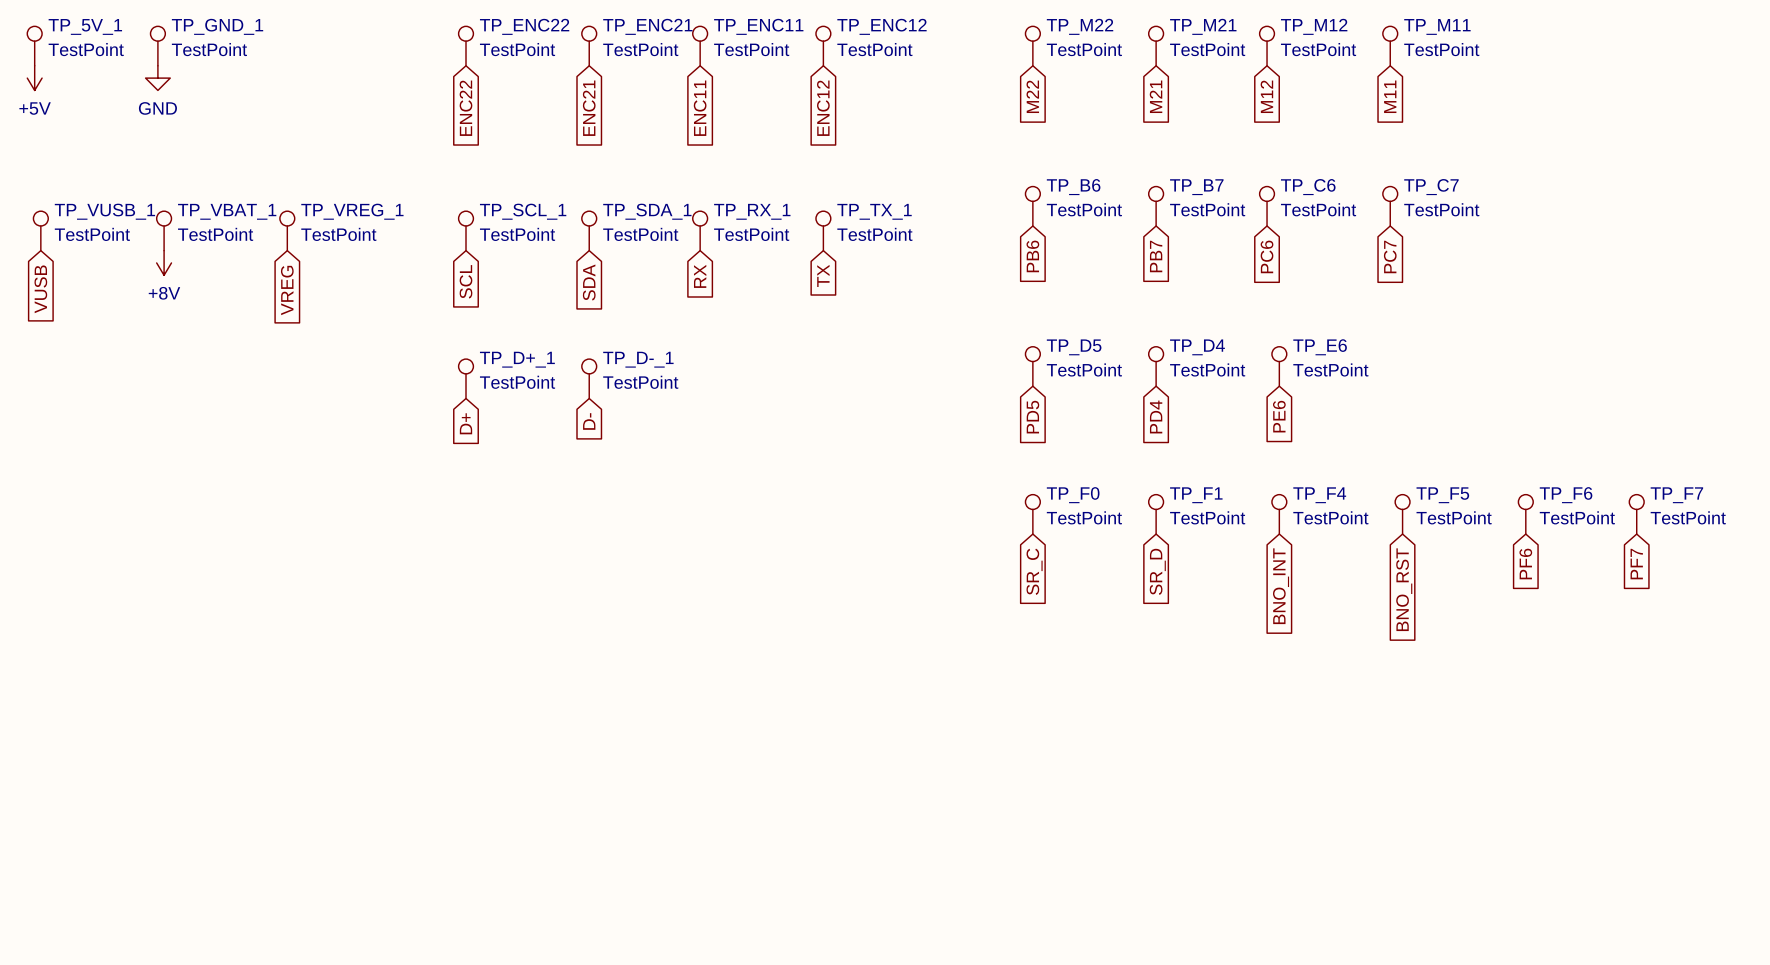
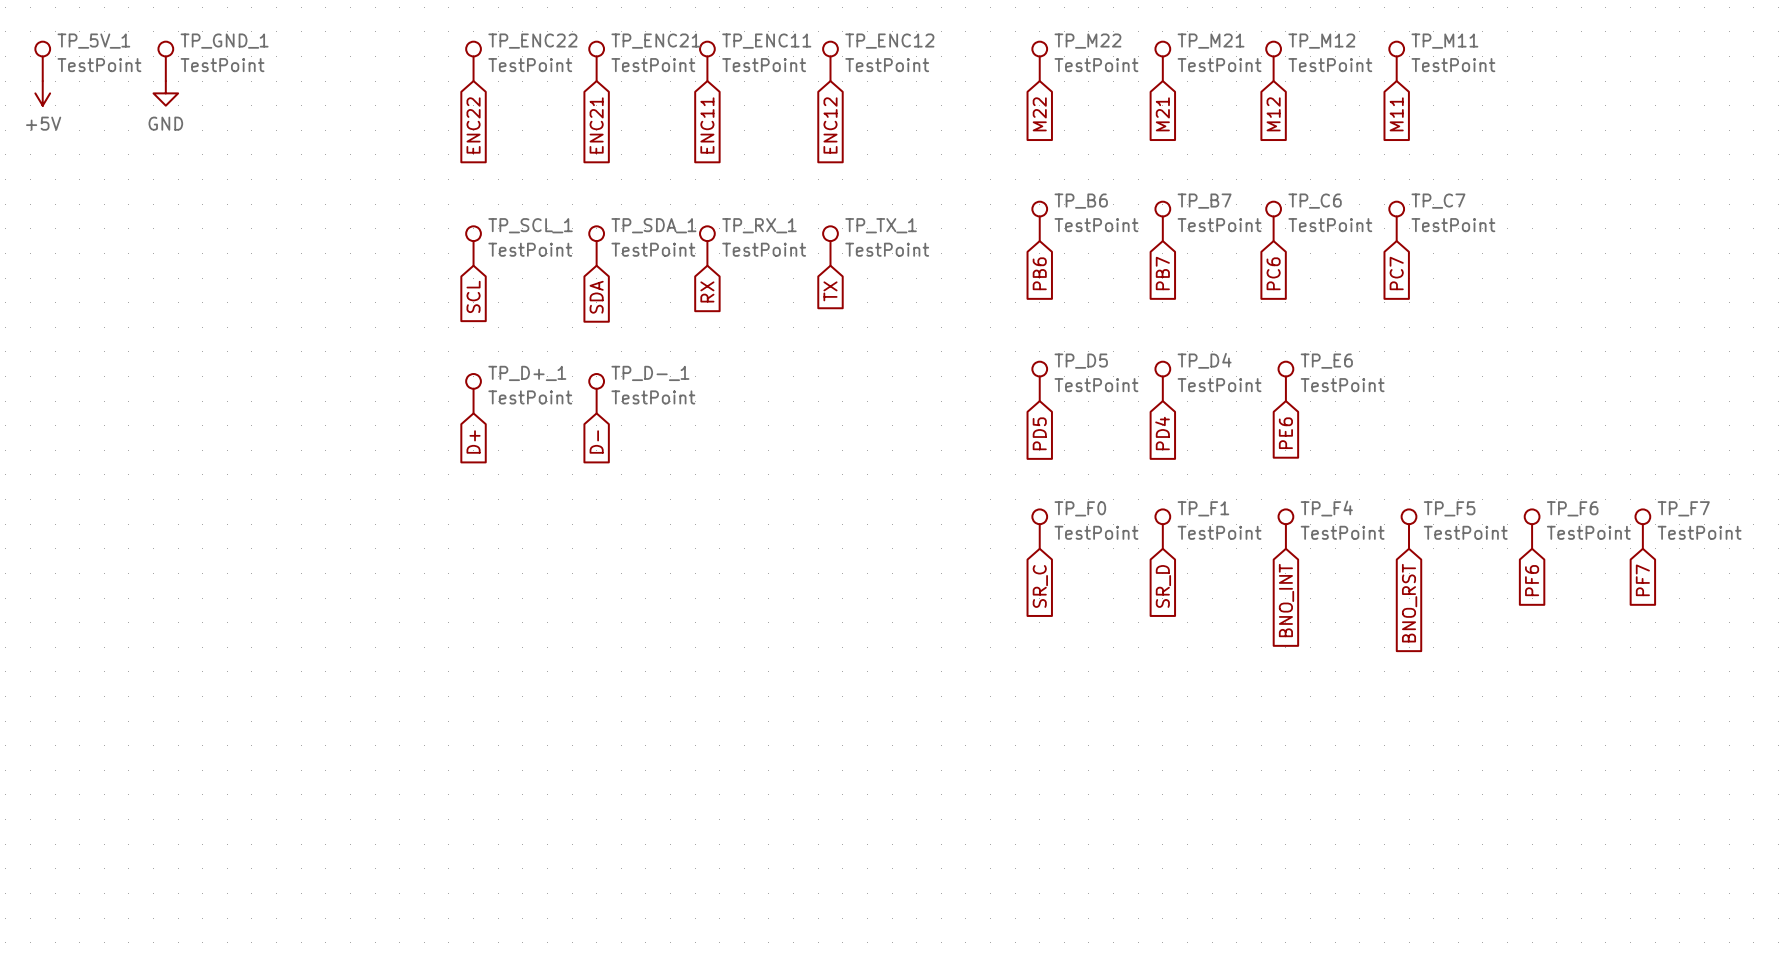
TP_VUSB_1: TestPoint (40, 230) -> none
TP_VBAT_1: TestPoint (164, 230) -> none
TP_VREG_1: TestPoint (287, 230) -> none
power symbol: +8V (164, 262) -> none
global label: VUSB (40, 289) -> none
global label: VREG (287, 290) -> none

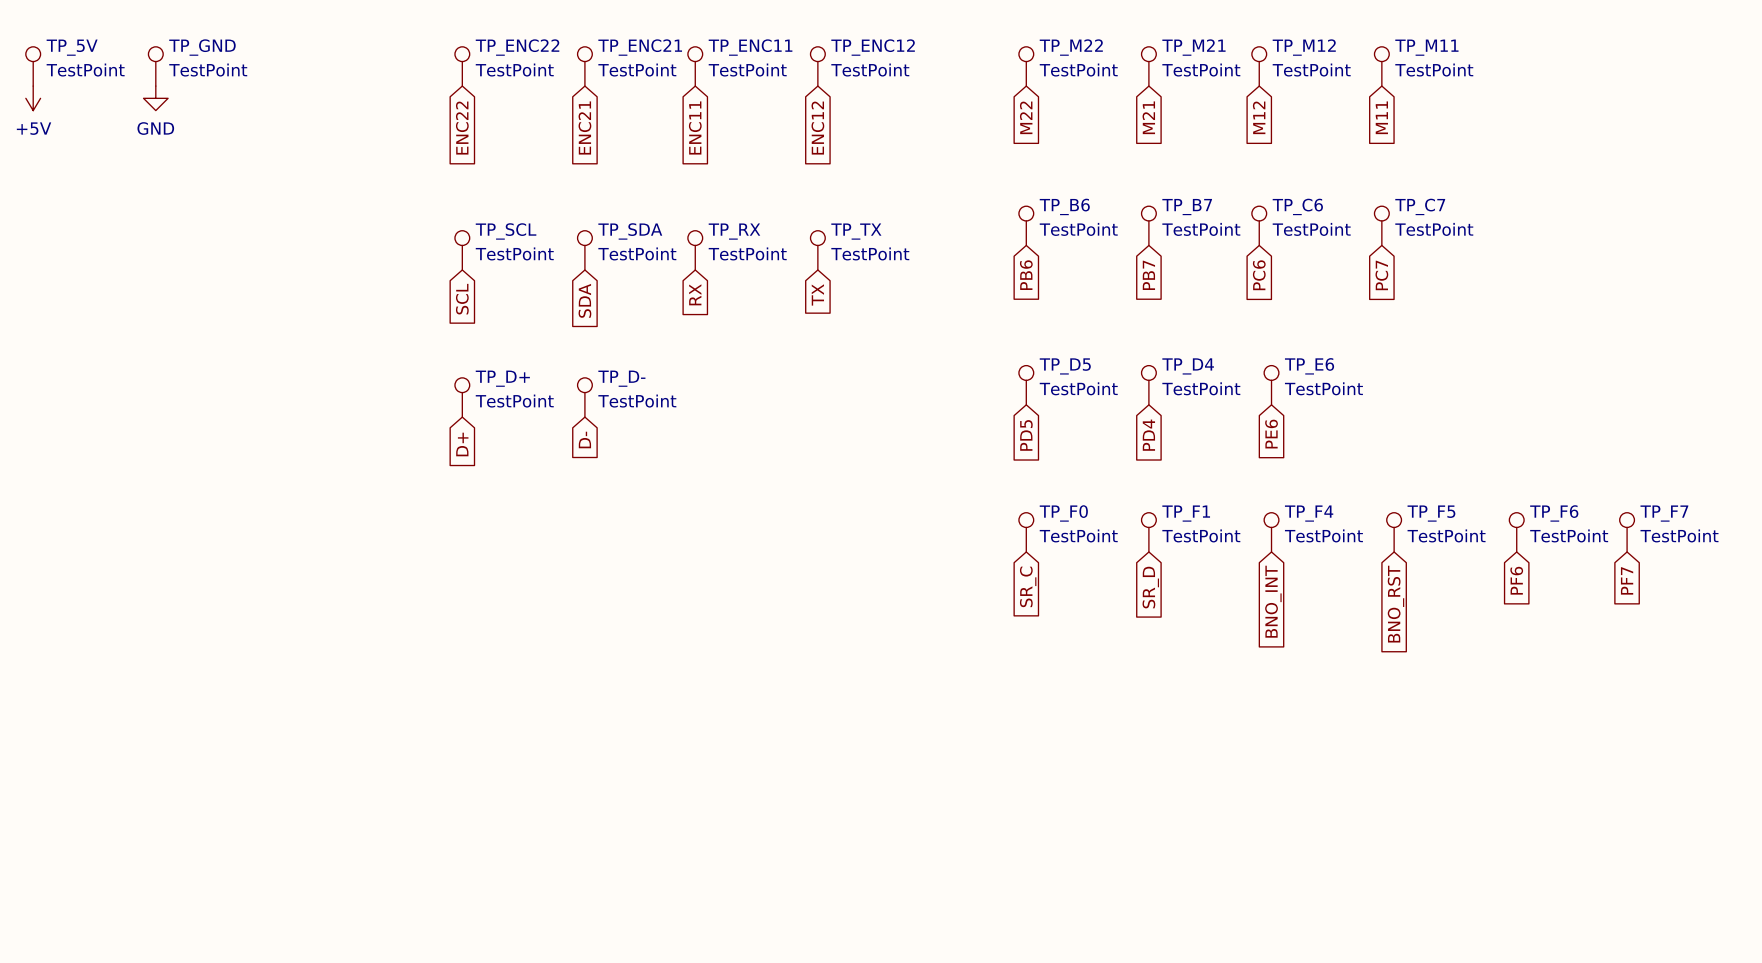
TP_5V_1 name: TP_5V_1 (93, 41) -> TP_5V (72, 47)
TP_GND_1 name: TP_GND_1 (224, 41) -> TP_GND (202, 47)
TP_SCL_1 name: TP_SCL_1 (530, 225) -> TP_SCL (506, 231)
TP_SDA_1 name: TP_SDA_1 (653, 225) -> TP_SDA (630, 231)
TP_RX_1 name: TP_RX_1 (759, 225) -> TP_RX (734, 231)
TP_TX_1 name: TP_TX_1 (881, 225) -> TP_TX (856, 231)
TP_D+_1 name: TP_D+_1 (527, 373) -> TP_D+ (502, 378)
TP_D-_1 name: TP_D-_1 (650, 373) -> TP_D- (621, 378)

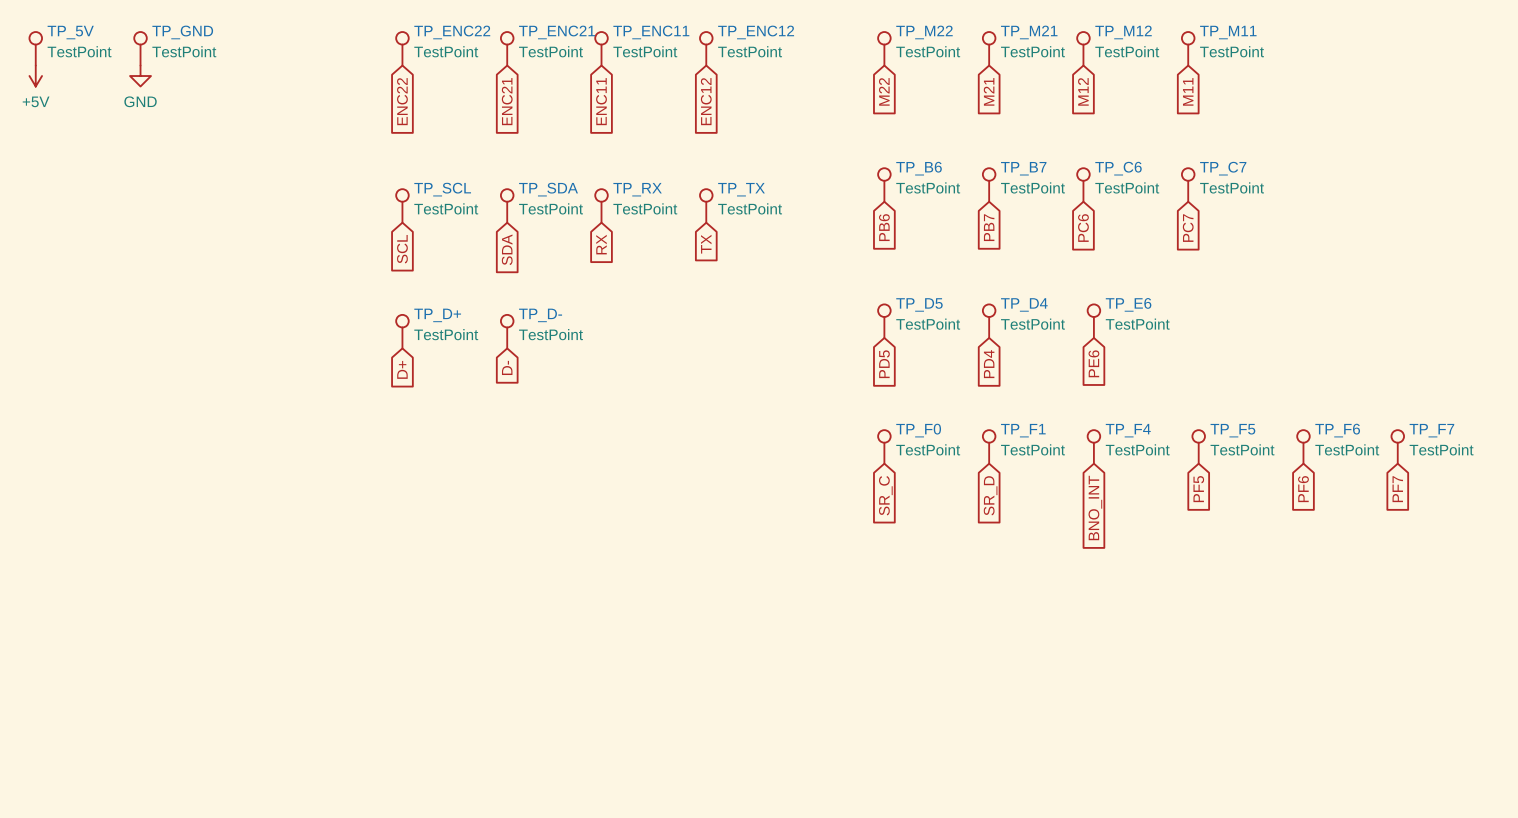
global label: BNO_RST (1395, 604) -> PF5 (1198, 489)

